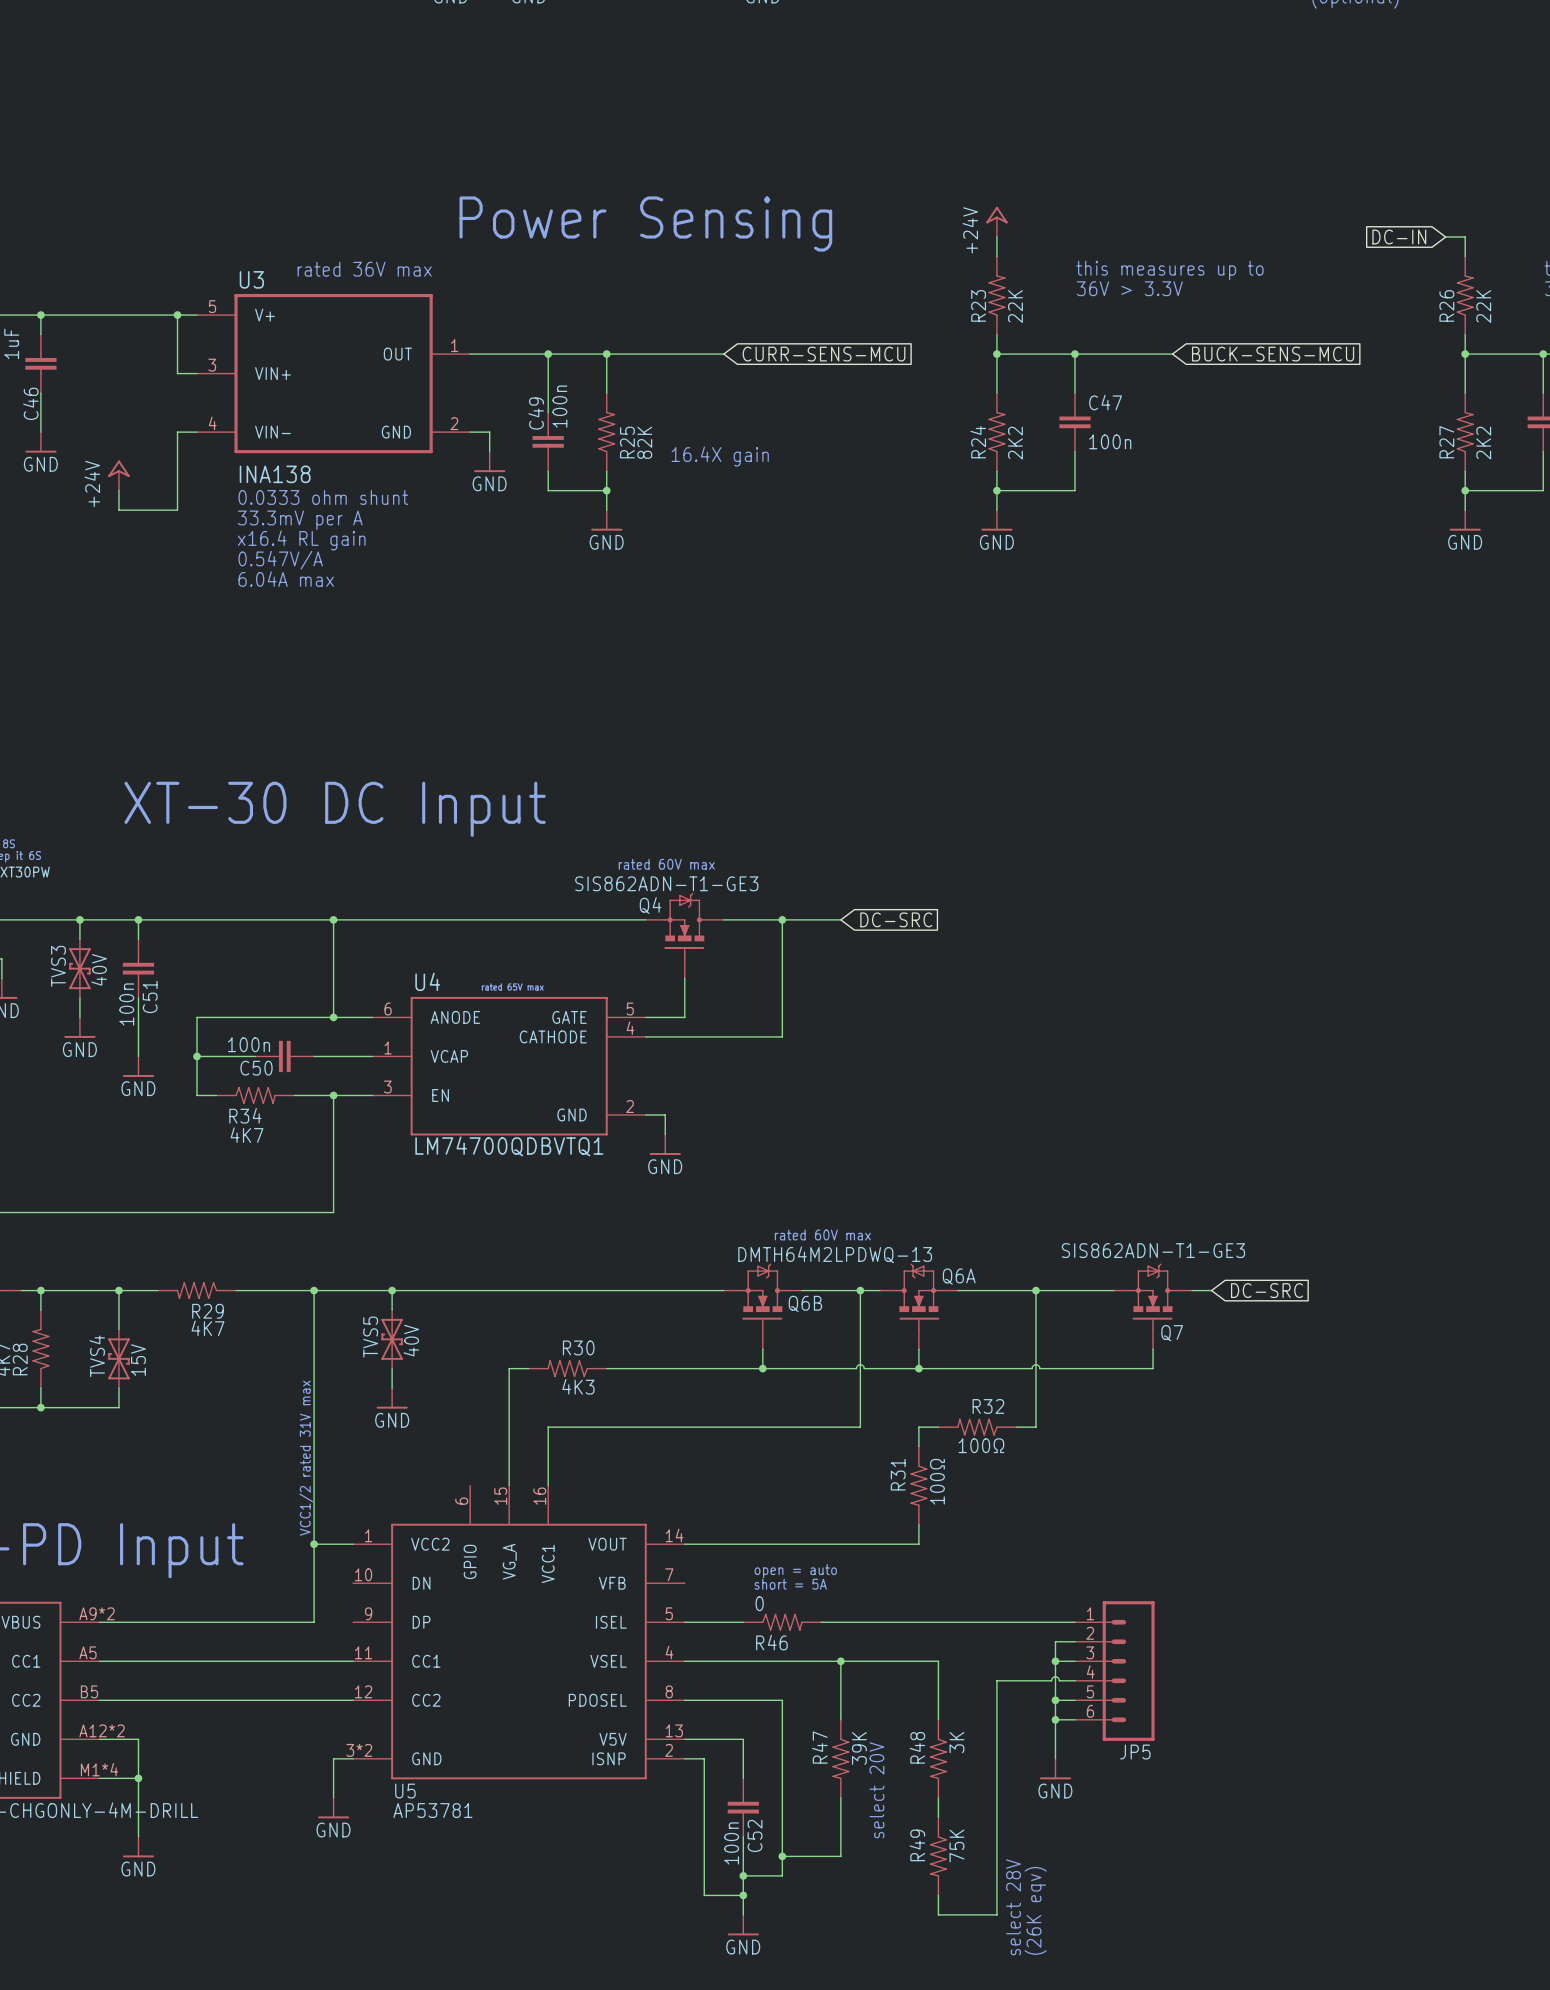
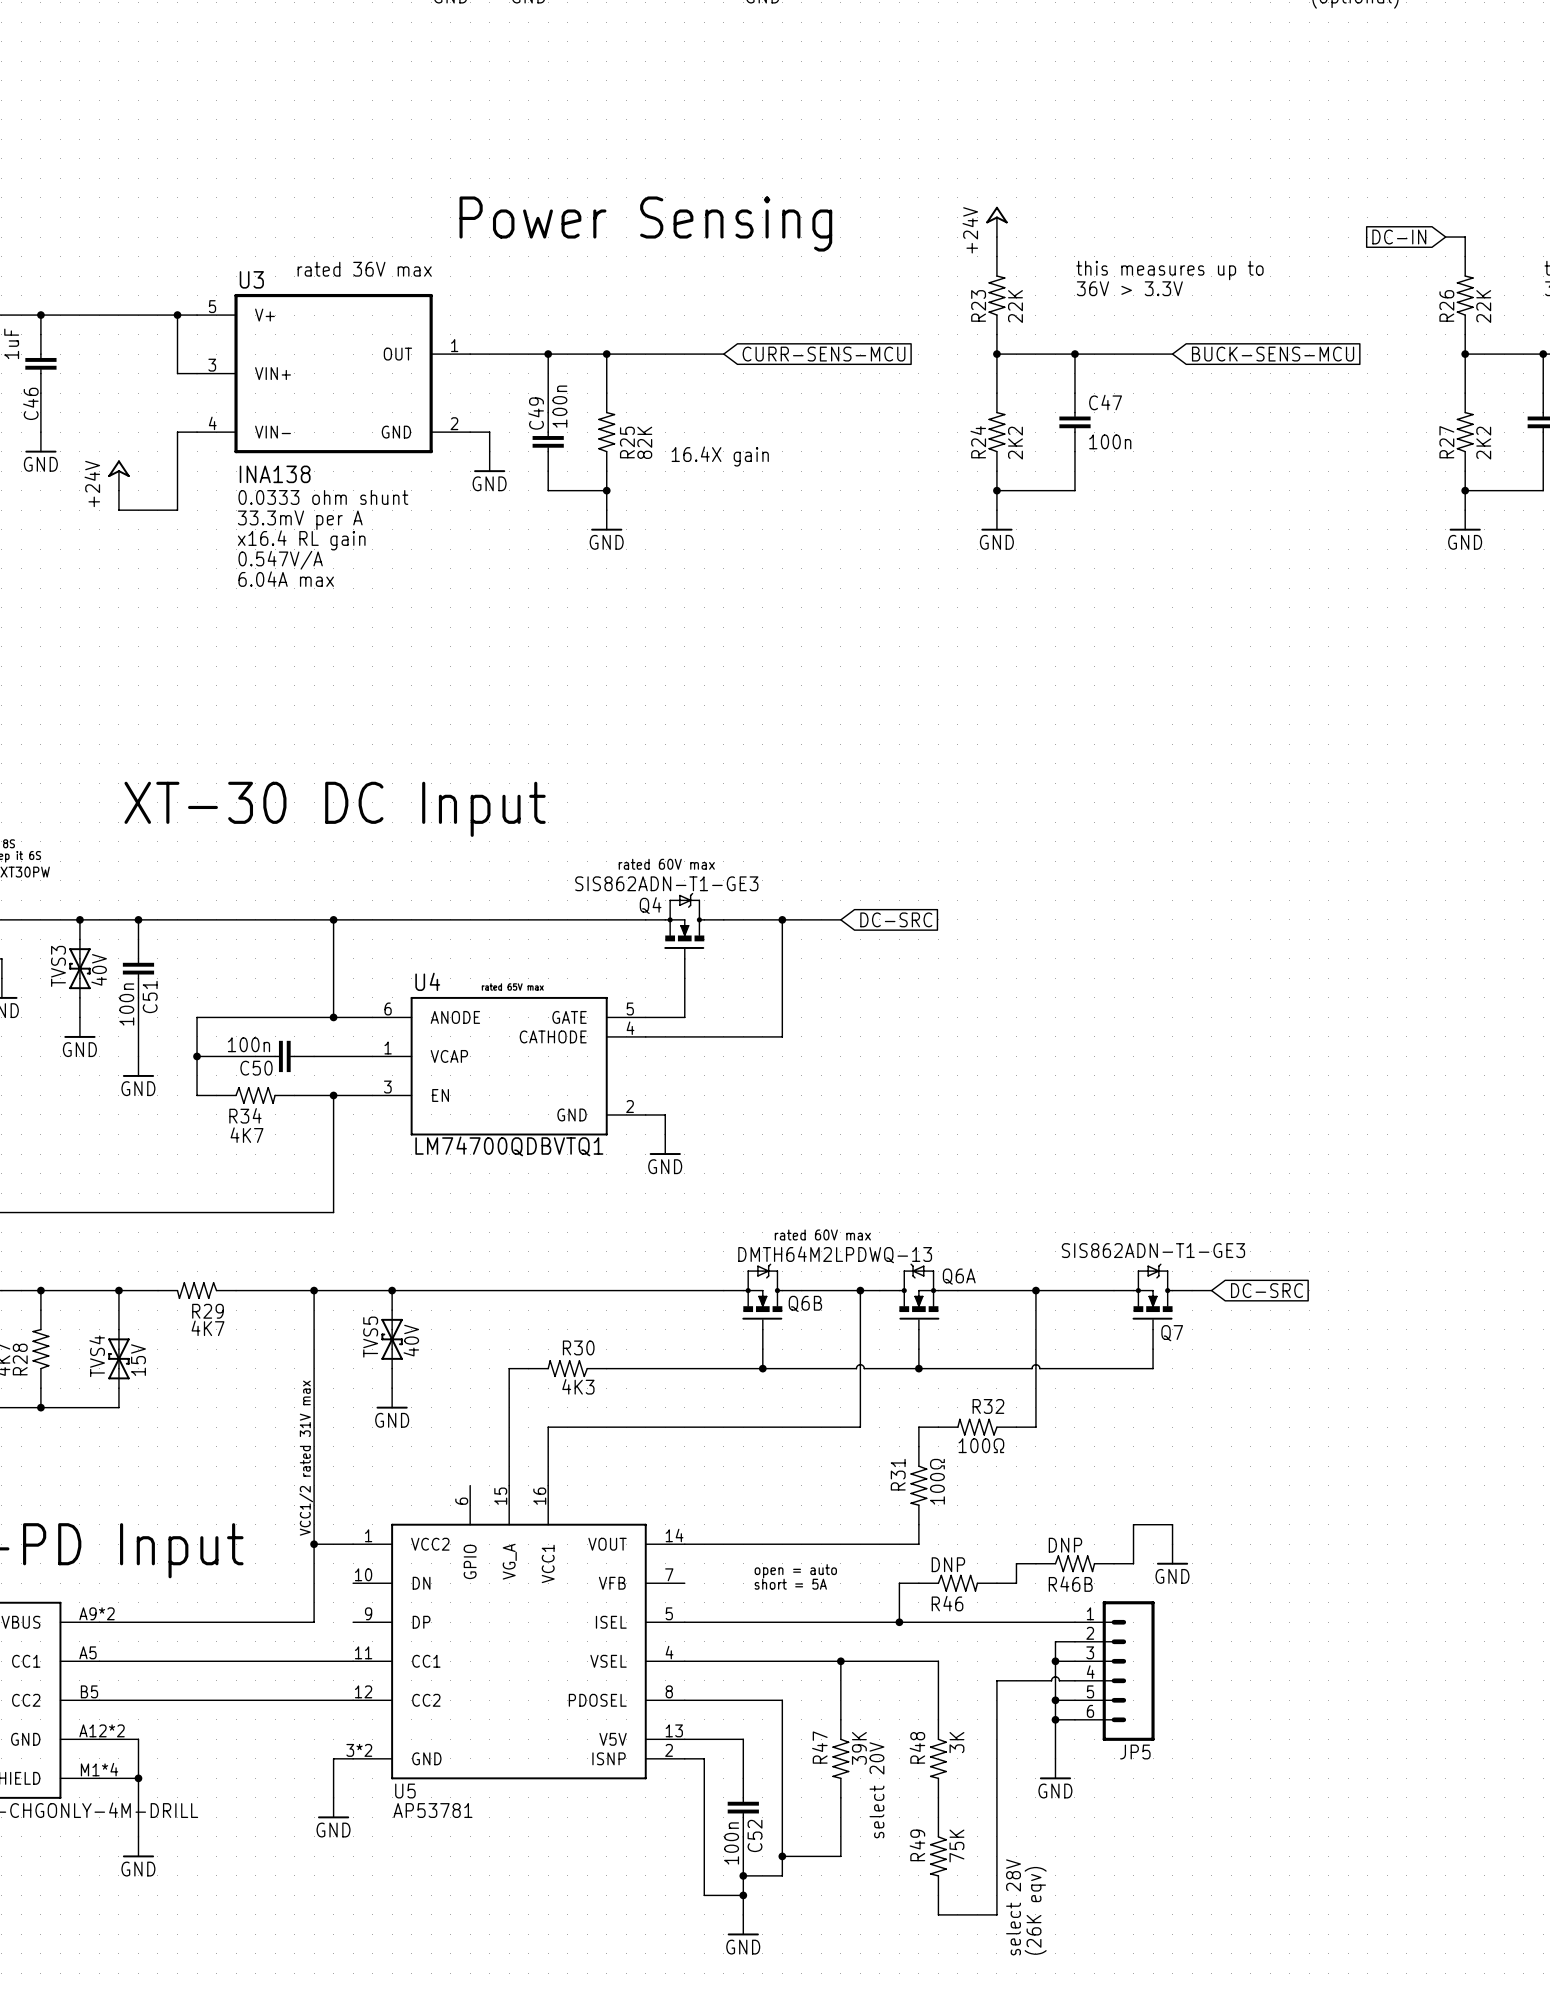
wire: none -> (1172, 1544) (1172, 1524) (1133, 1524) (1133, 1563) (1114, 1563)
power symbol: none -> GND (1172, 1554)
wire: none -> (1035, 1563) (1016, 1563) (1016, 1583) (996, 1583)
R46B: none -> DNP (1074, 1563)
wire: none -> (918, 1583) (899, 1583) (899, 1622)
R46 value: 0 (759, 1603) -> DNP (948, 1564)
R46 position: (782, 1622) -> (957, 1583)
junction: none -> (899, 1622)

